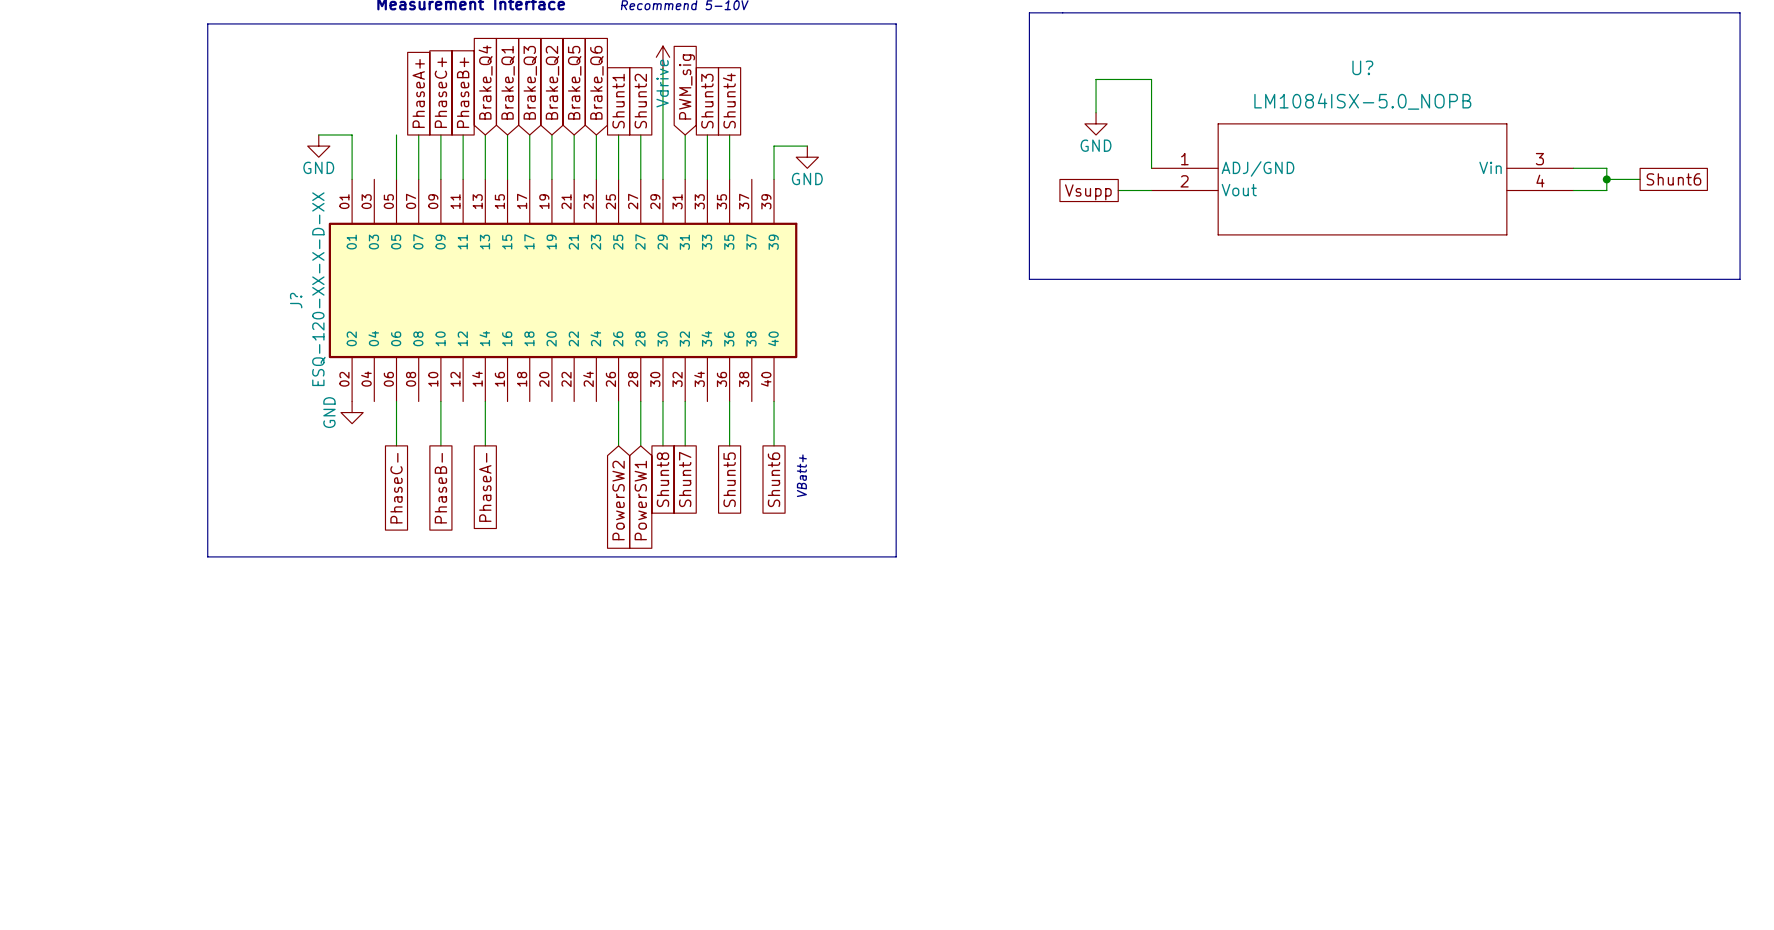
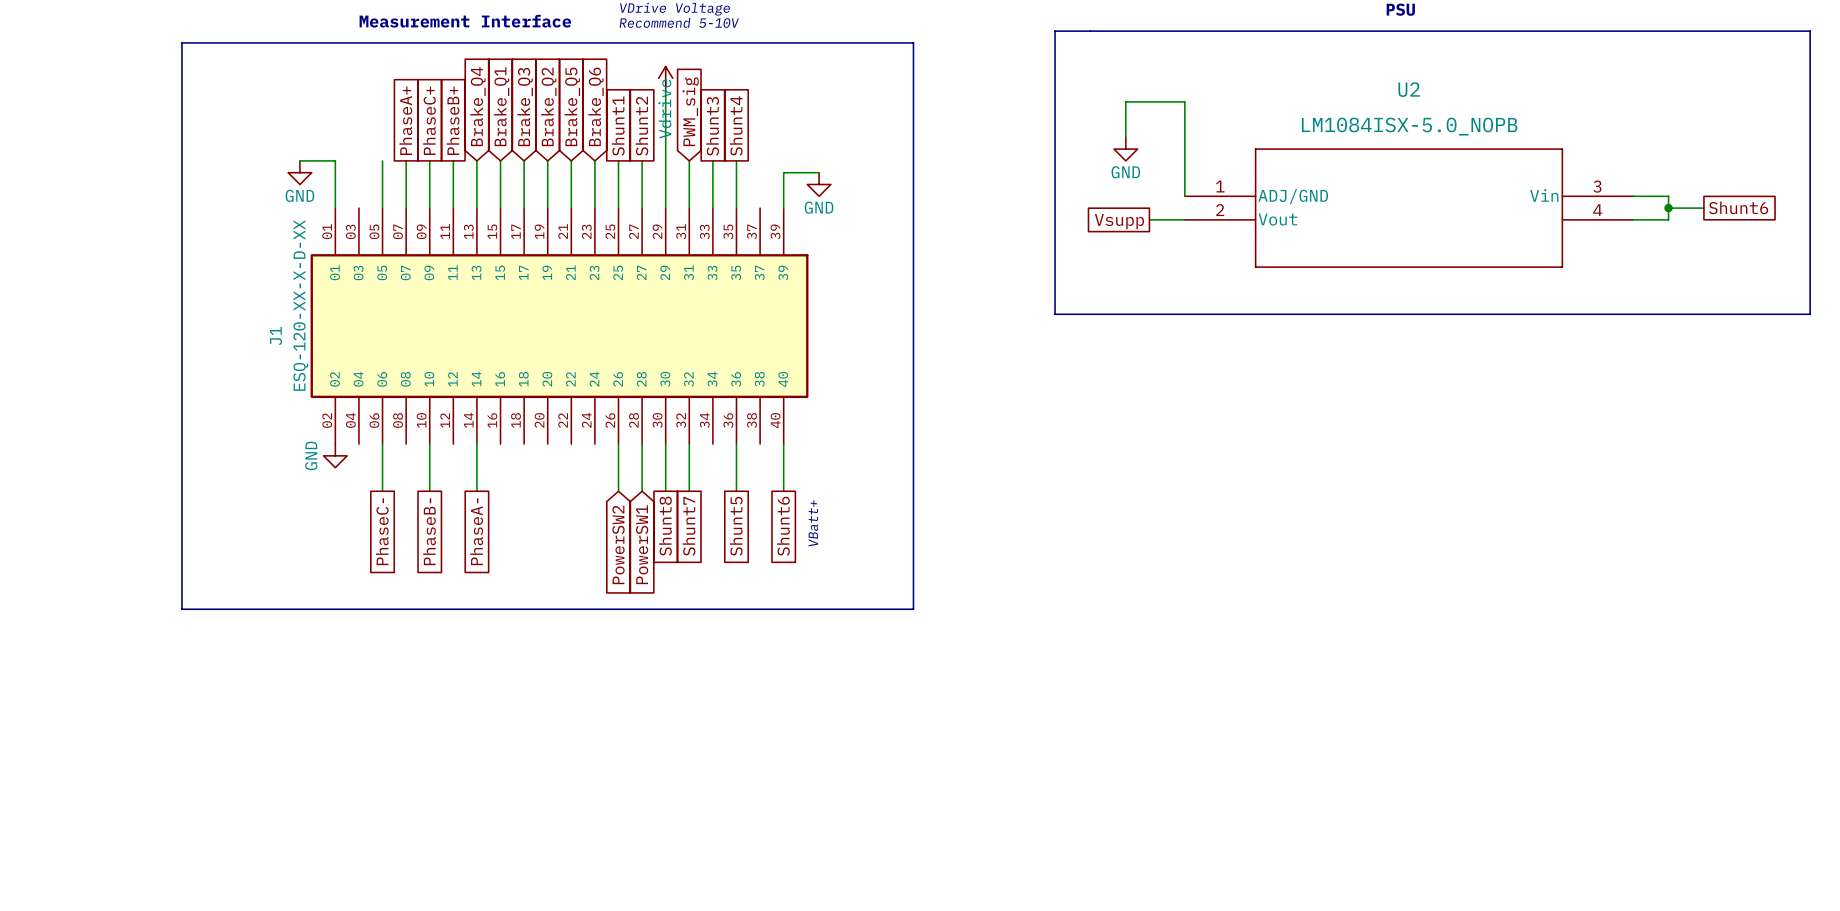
U? name: U? (1362, 67) -> U2 (1409, 89)
J? name: J? (296, 300) -> J1 (276, 336)

